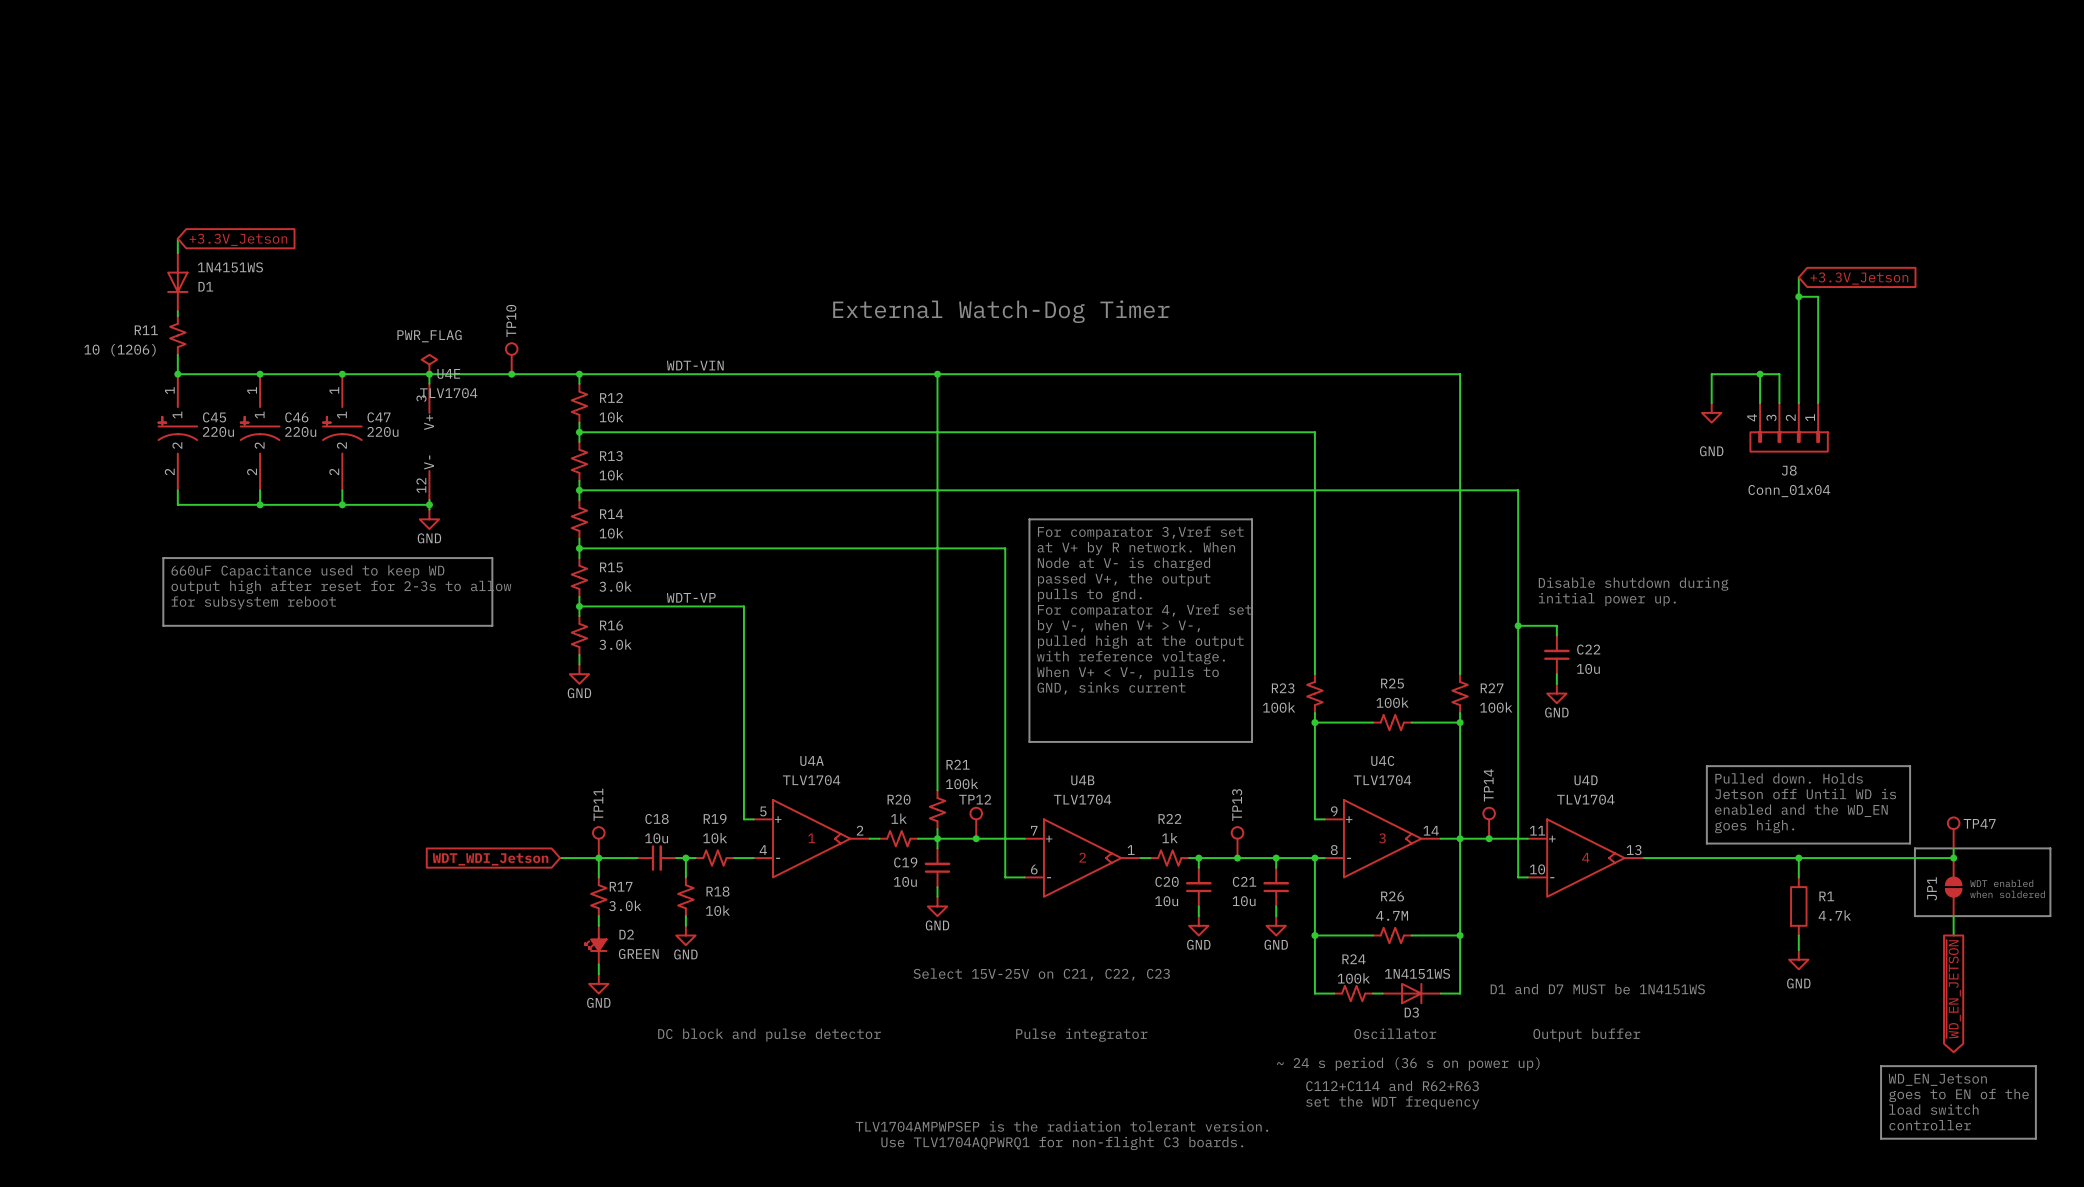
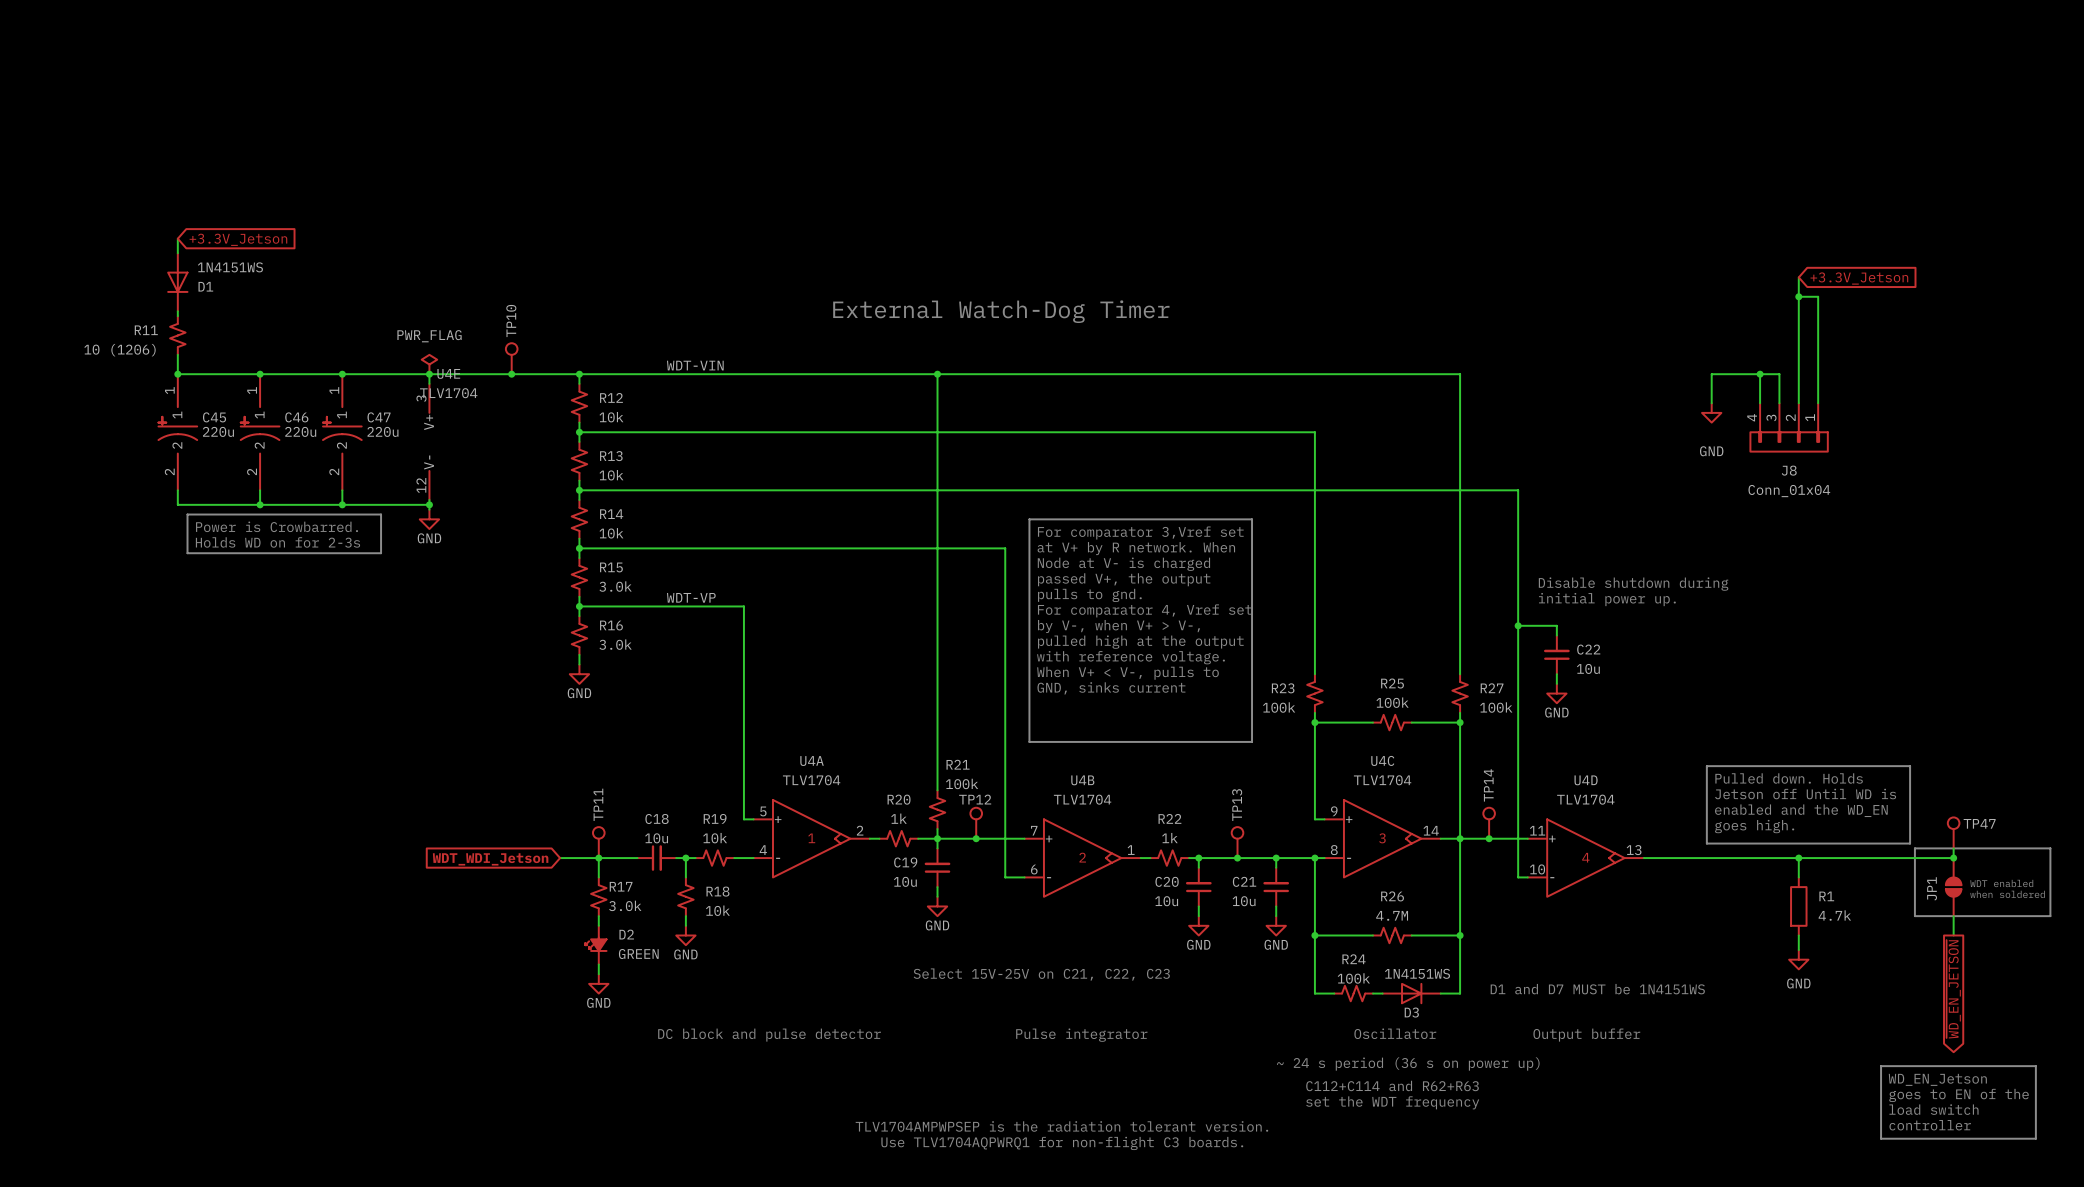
line: none -> (187, 514) (381, 514) (381, 553) (187, 553) (187, 514)
text: none -> Power is Crowbarred. (277, 526)
text: none -> Holds WD on for 2-3s (277, 542)
line: (163, 558) (492, 558) (492, 625) (163, 625) (163, 558) -> none
text: 660uF Capacitance used to keep WD (307, 571) -> none
text: output high after reset for 2-3s to allow (341, 587) -> none
text: for subsystem reboot (253, 602) -> none

